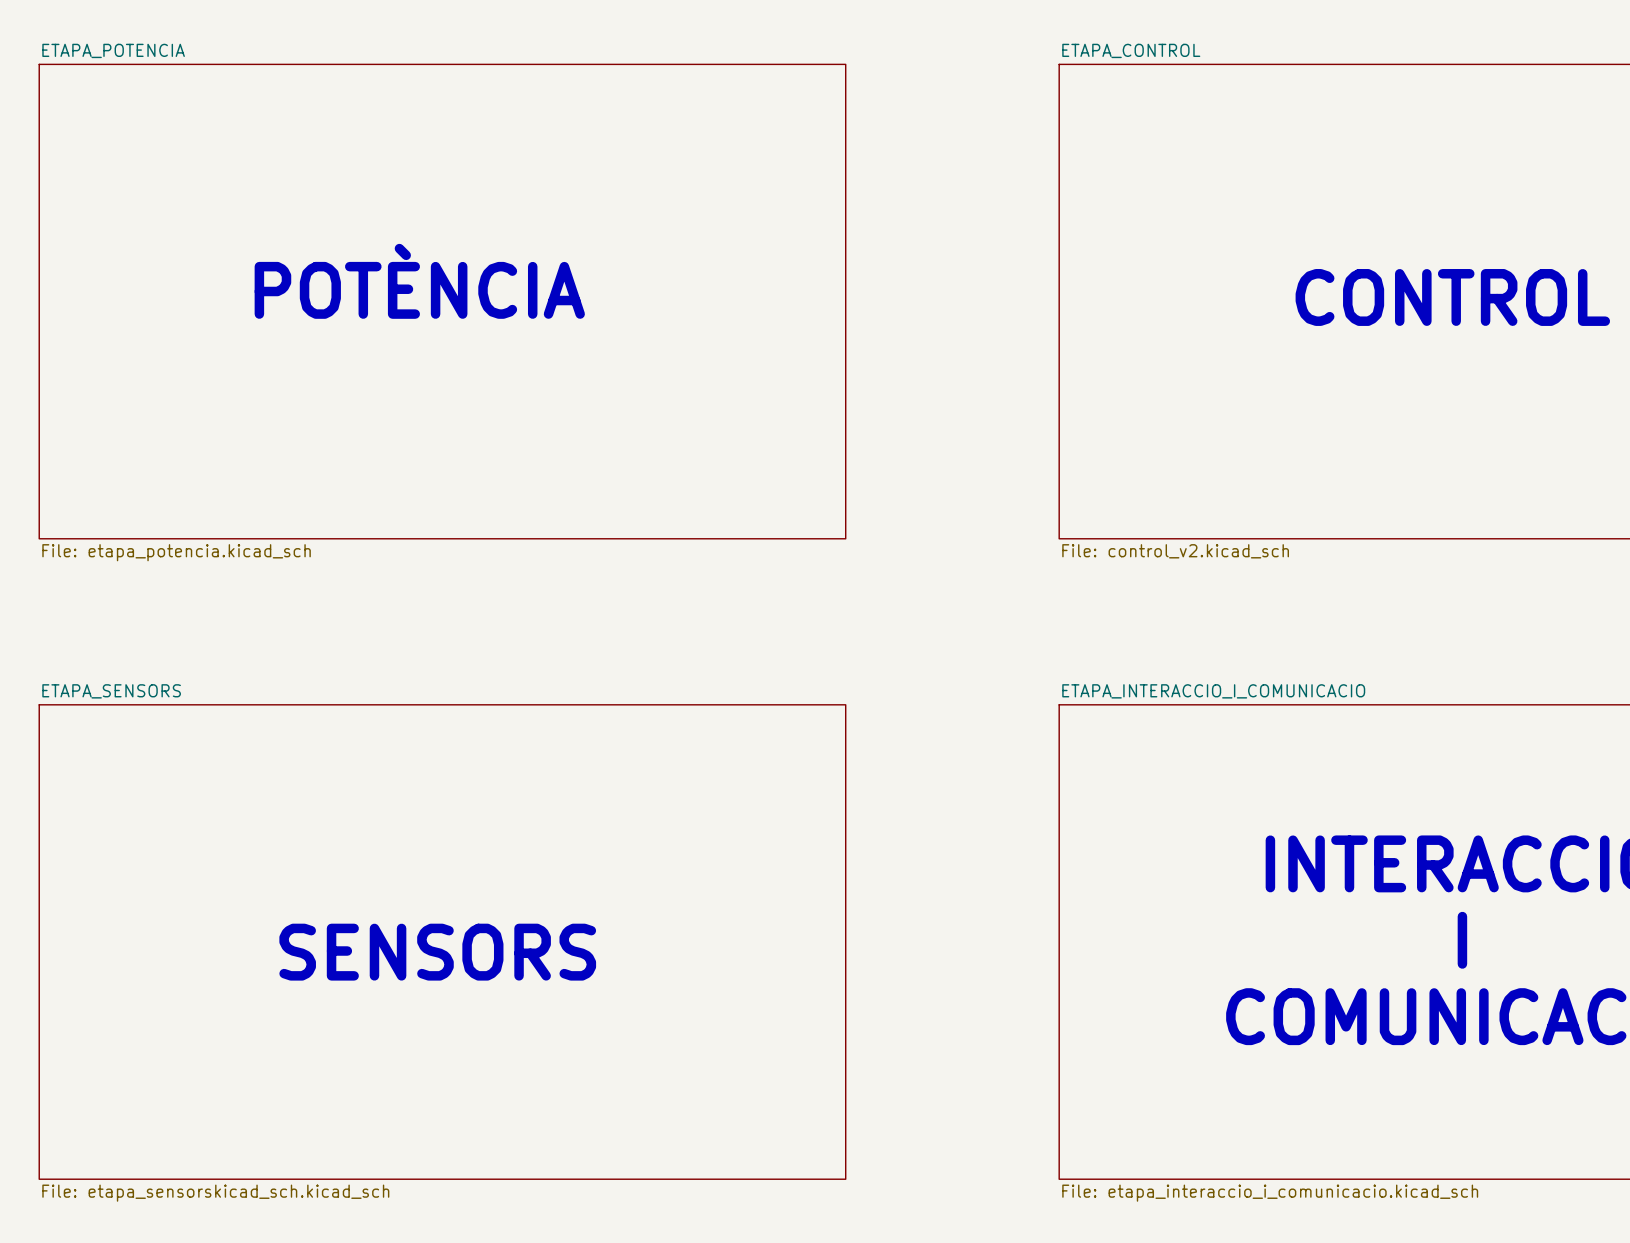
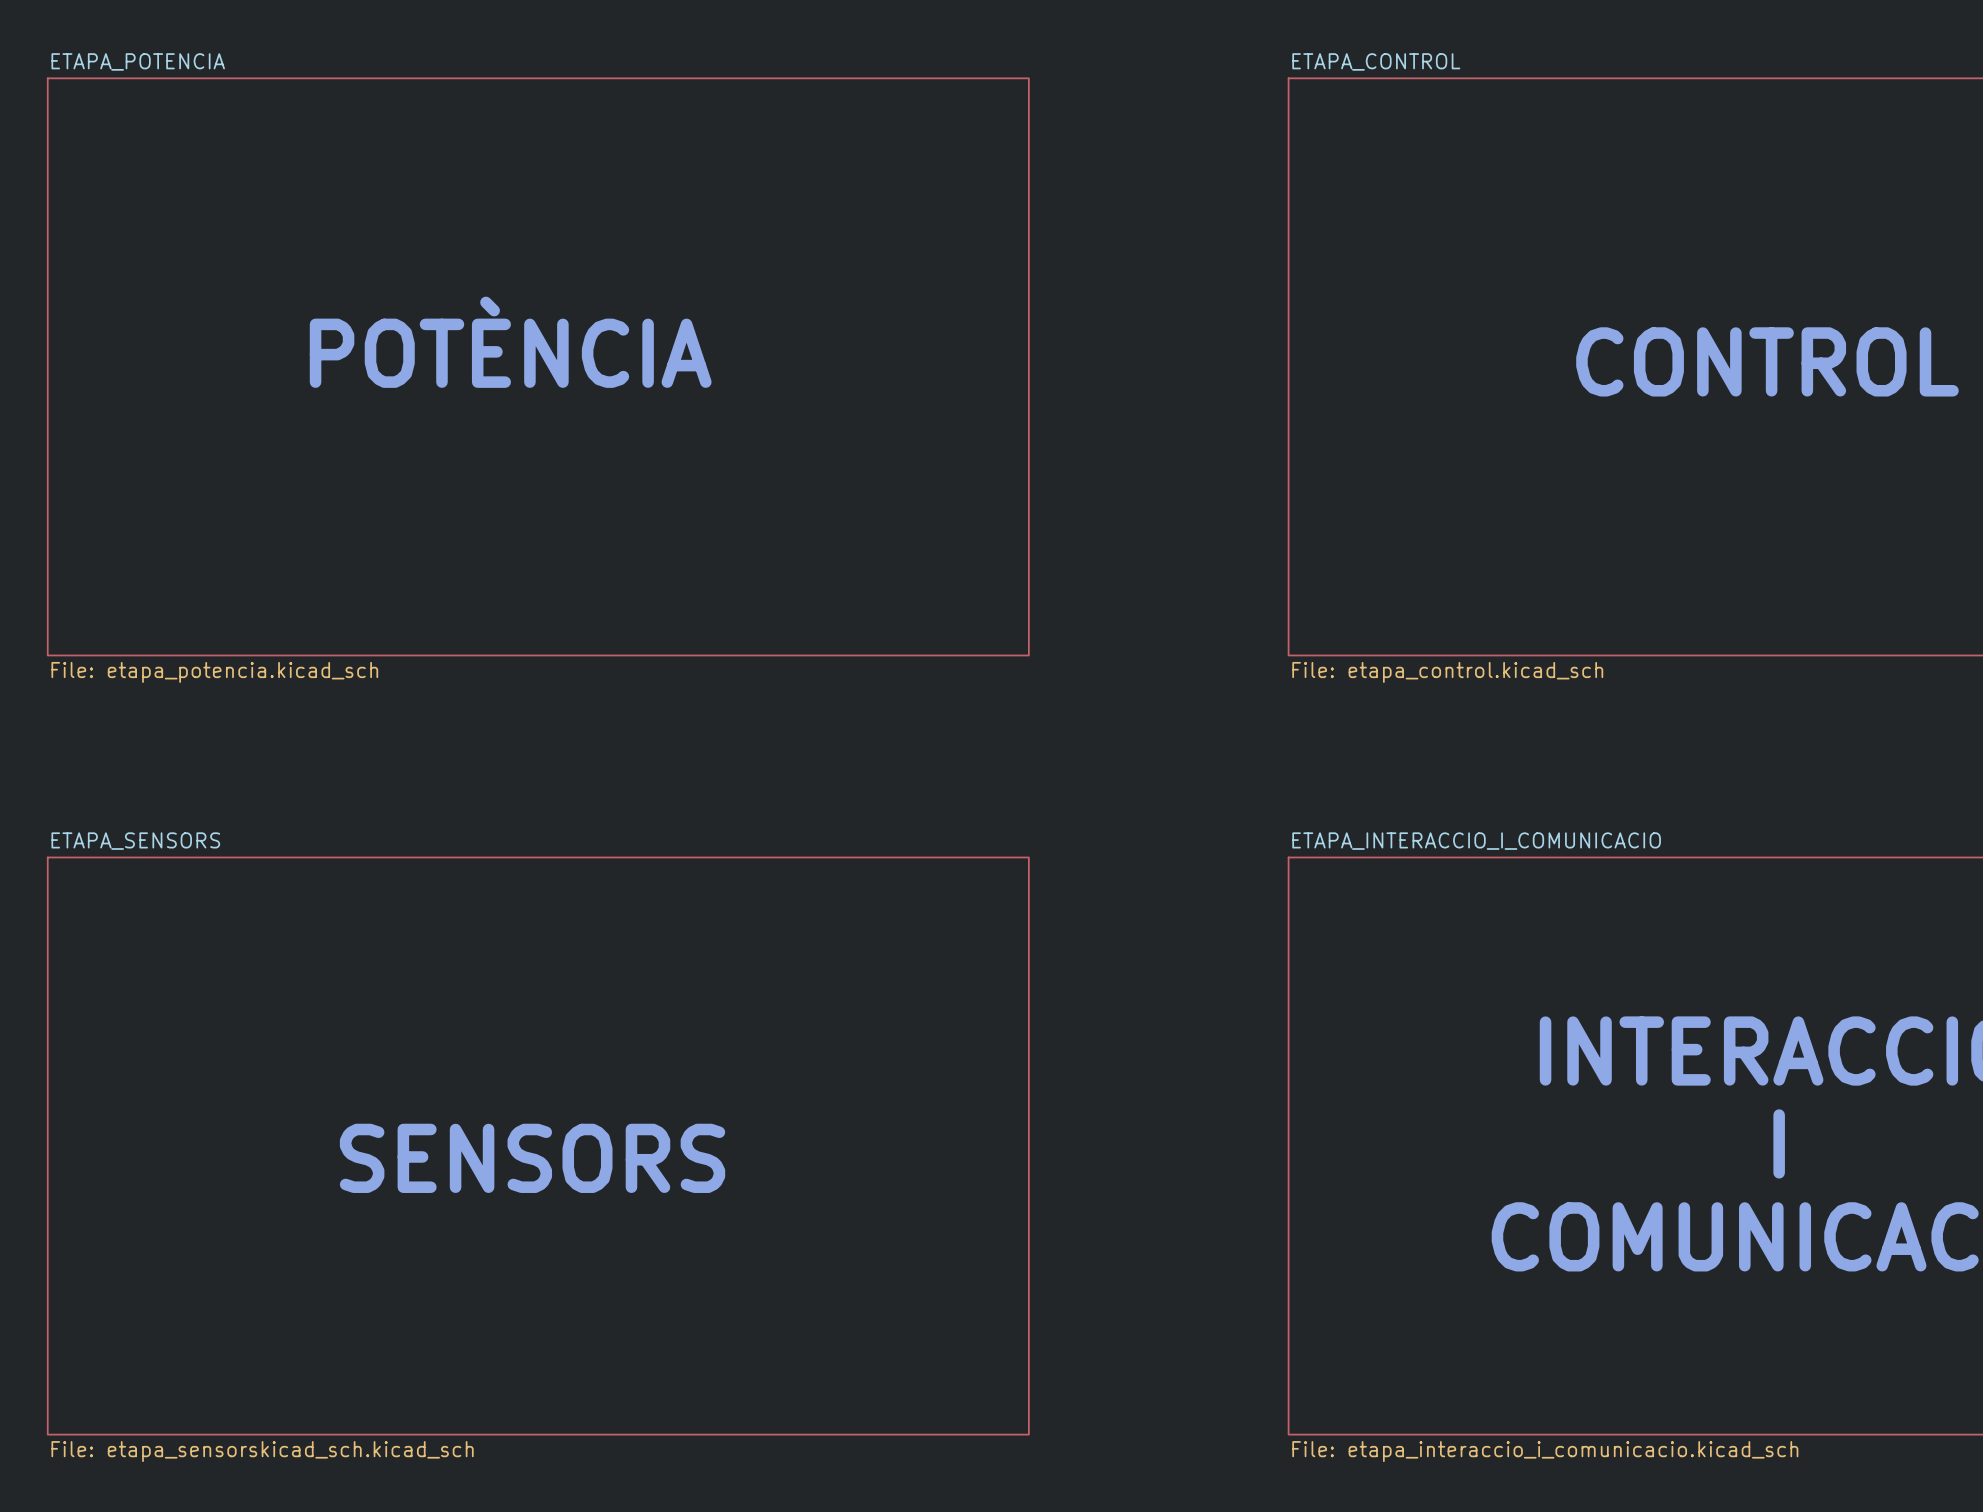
sheet ETAPA_CONTROL value: File: control_v2.kicad_sch (1175, 551) -> File: etapa_control.kicad_sch (1447, 672)

